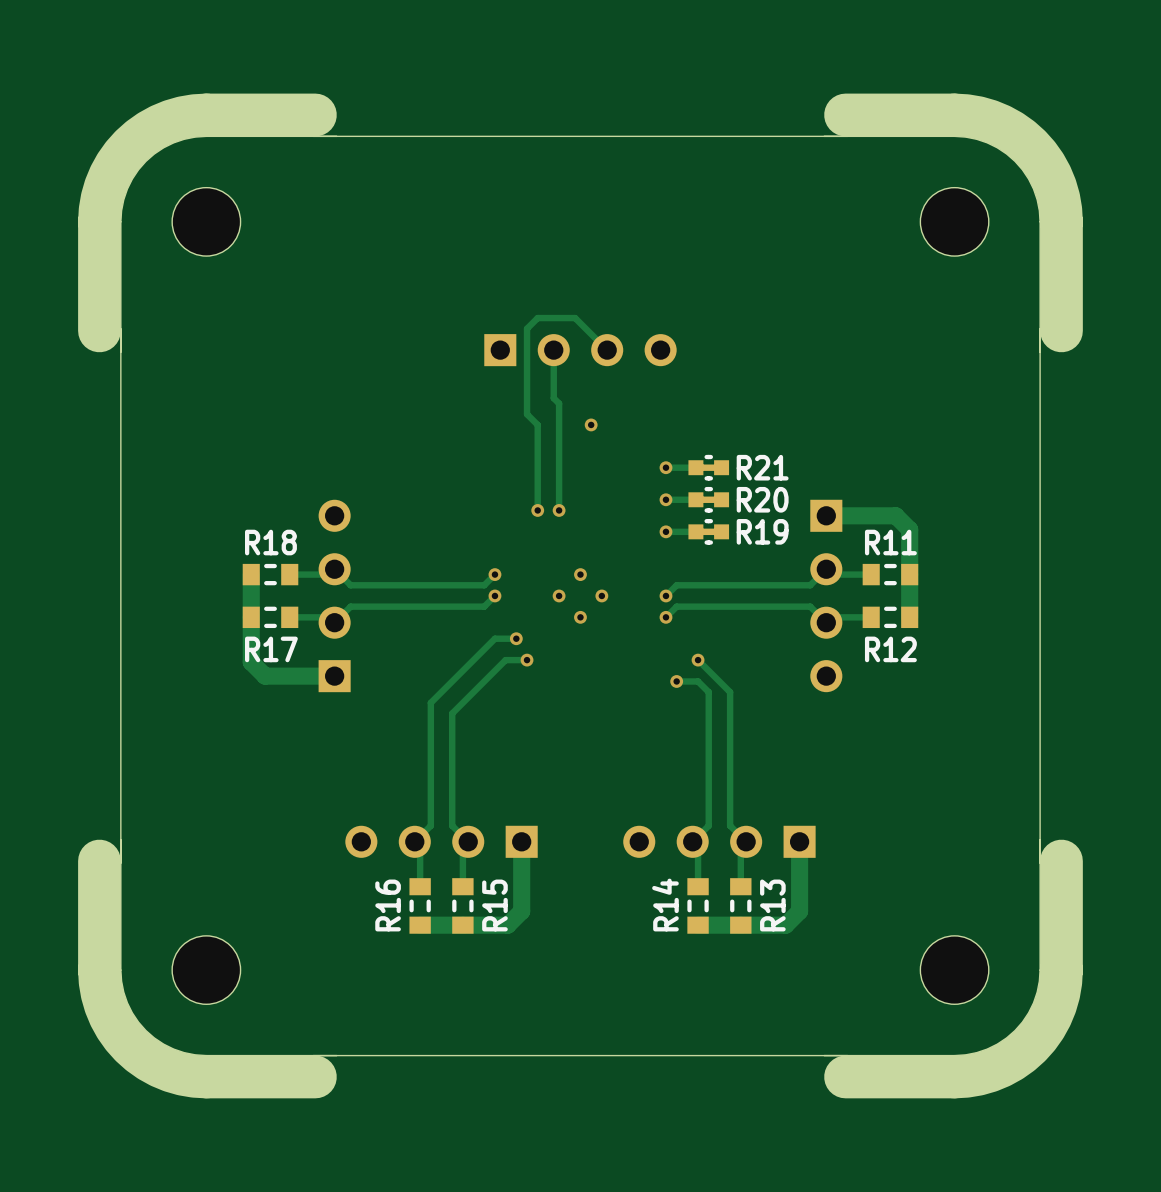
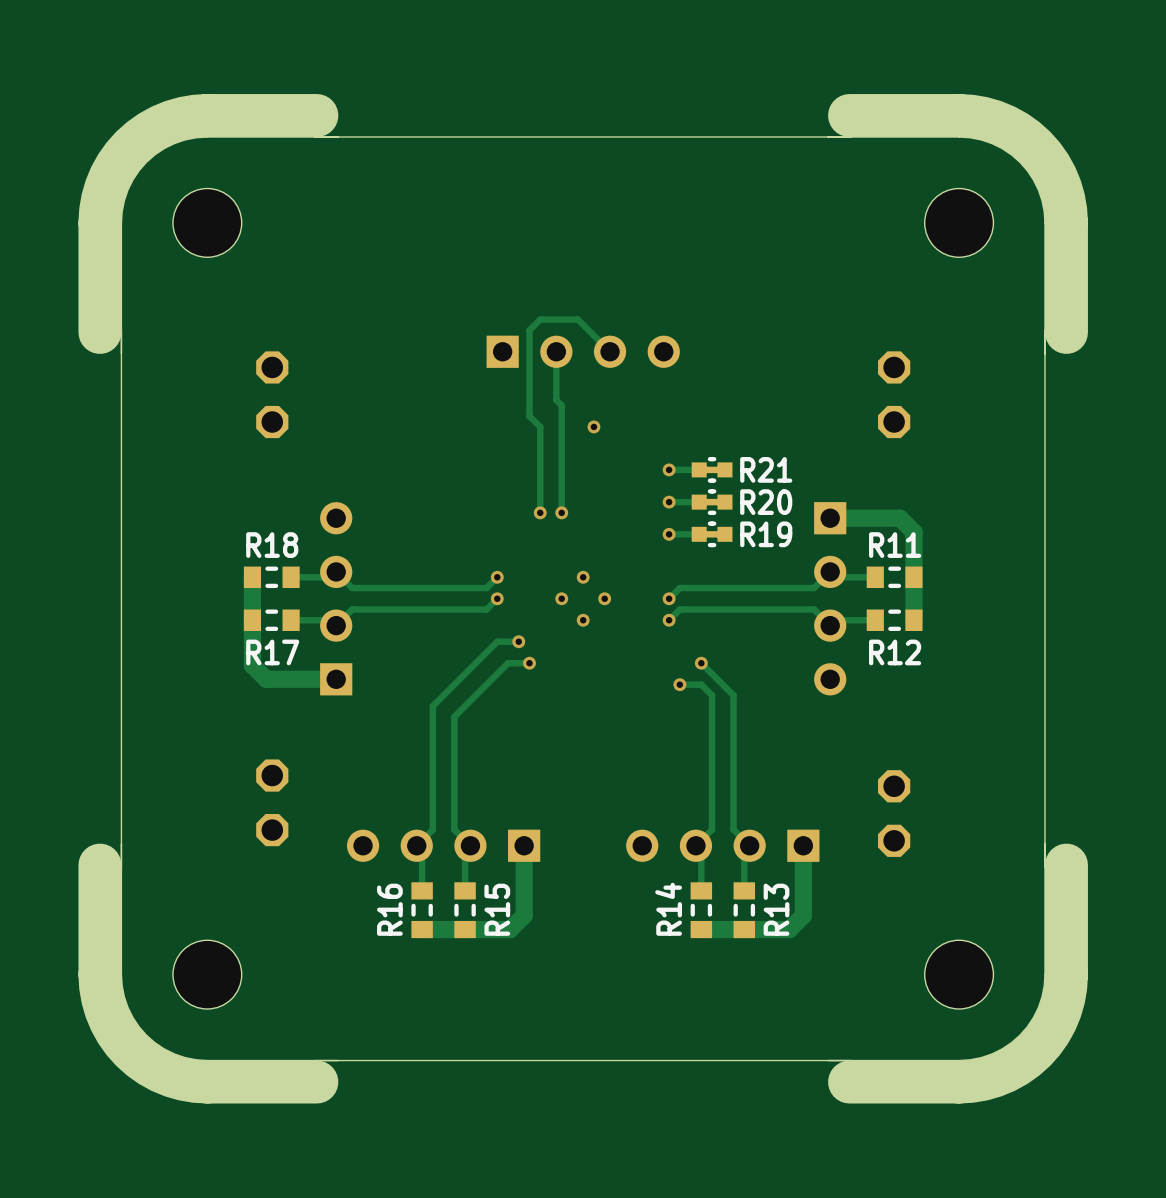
part: none -> (272, 394)
part: none -> (894, 394)
part: none -> (272, 802)
part: none -> (894, 813)

